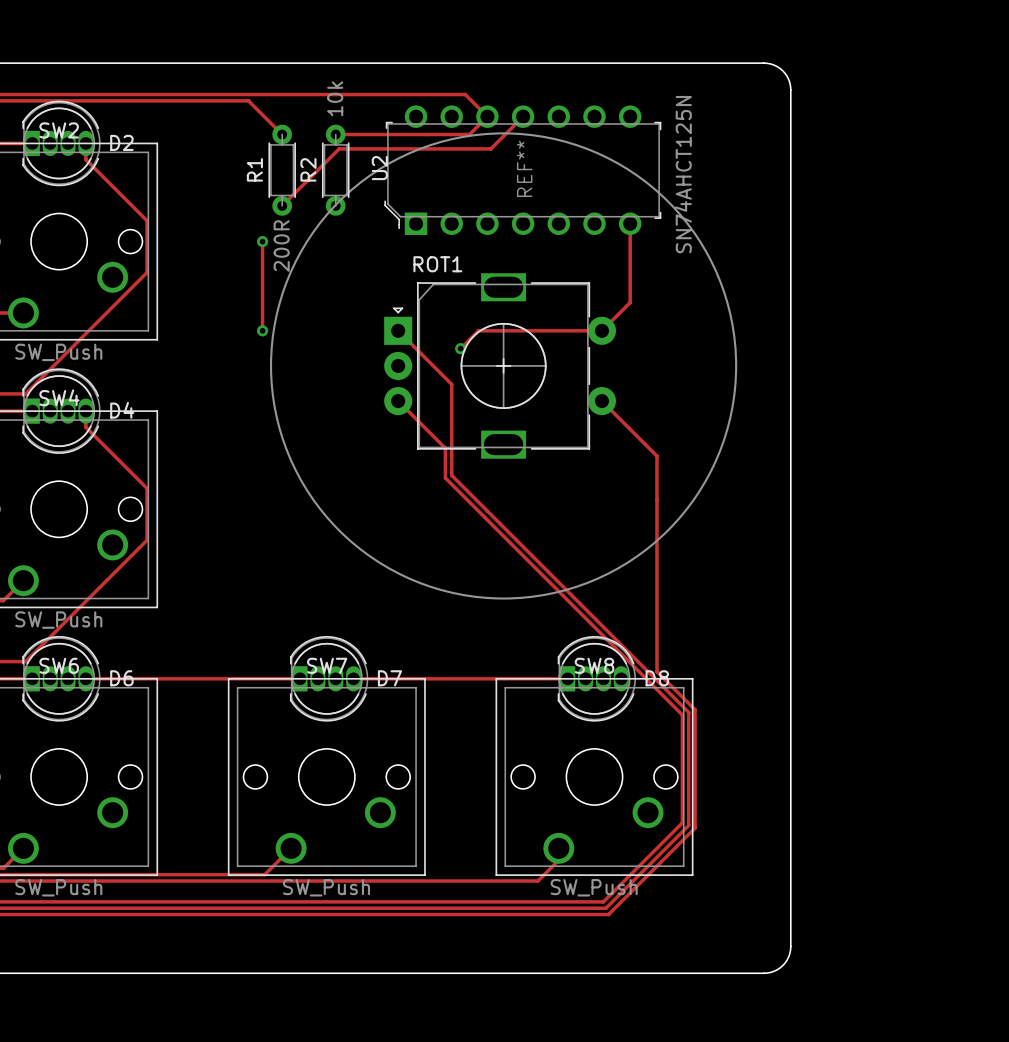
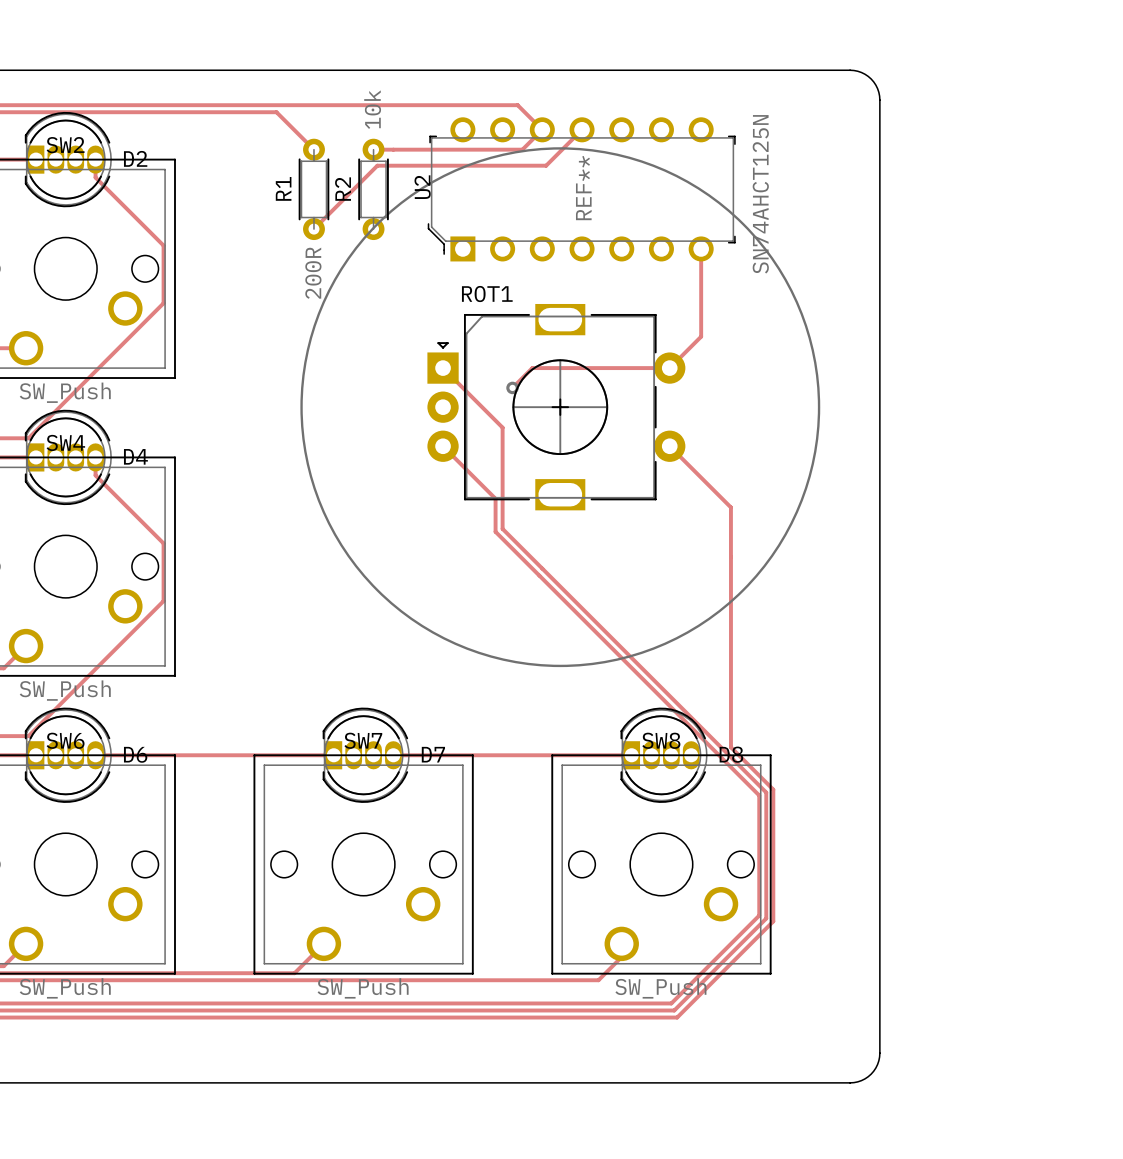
track: (262, 241) (262, 330) -> none
via: (262, 241) -> none
via: (262, 330) -> none

